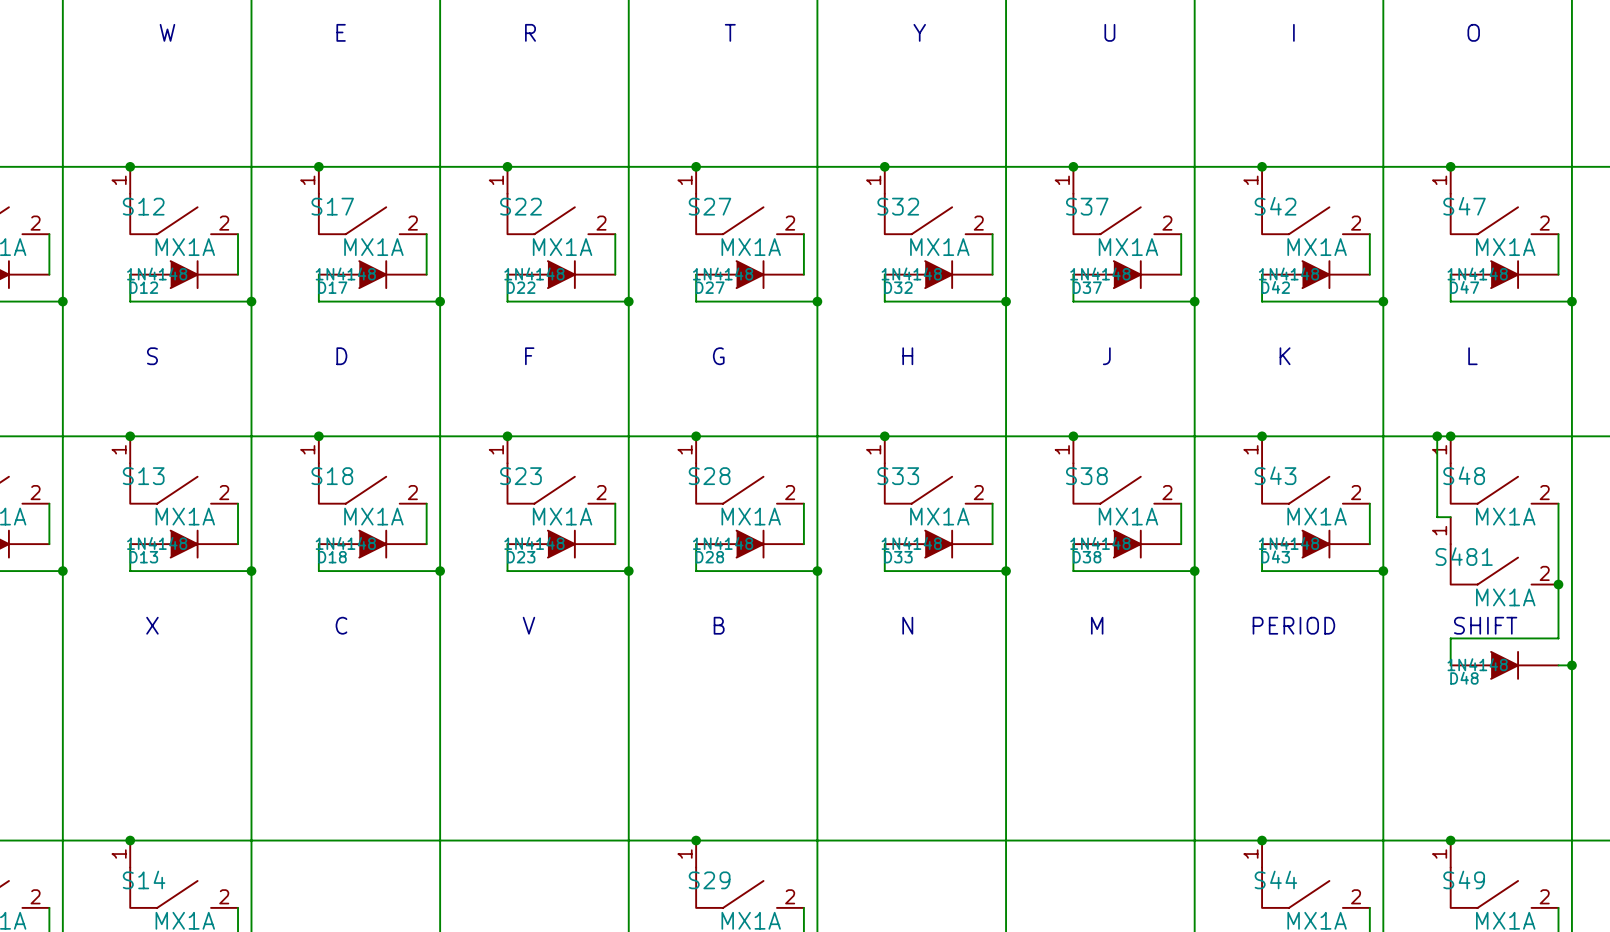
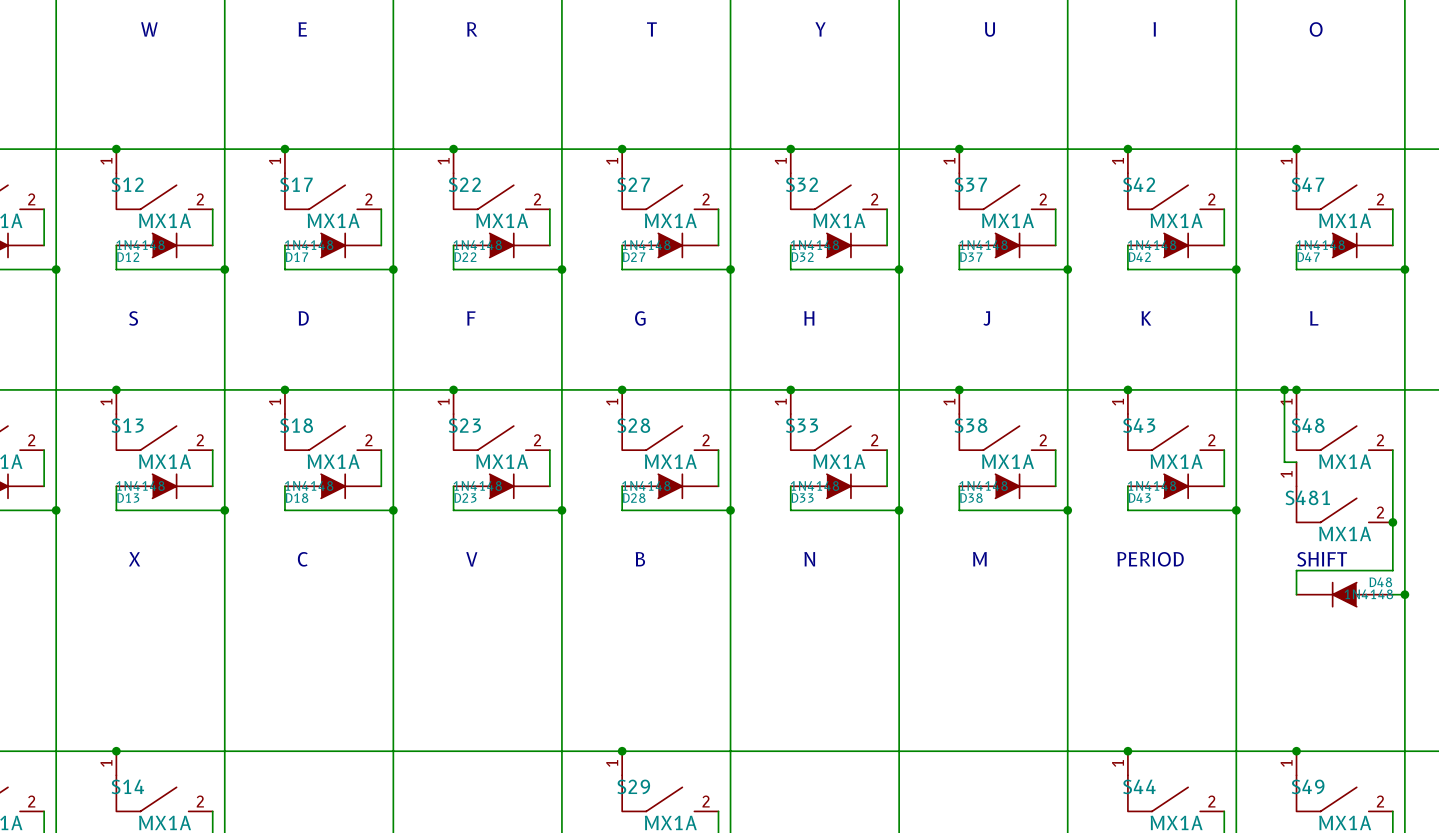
D48 rotation: 0° (1504, 665) -> 180° (1344, 594)

